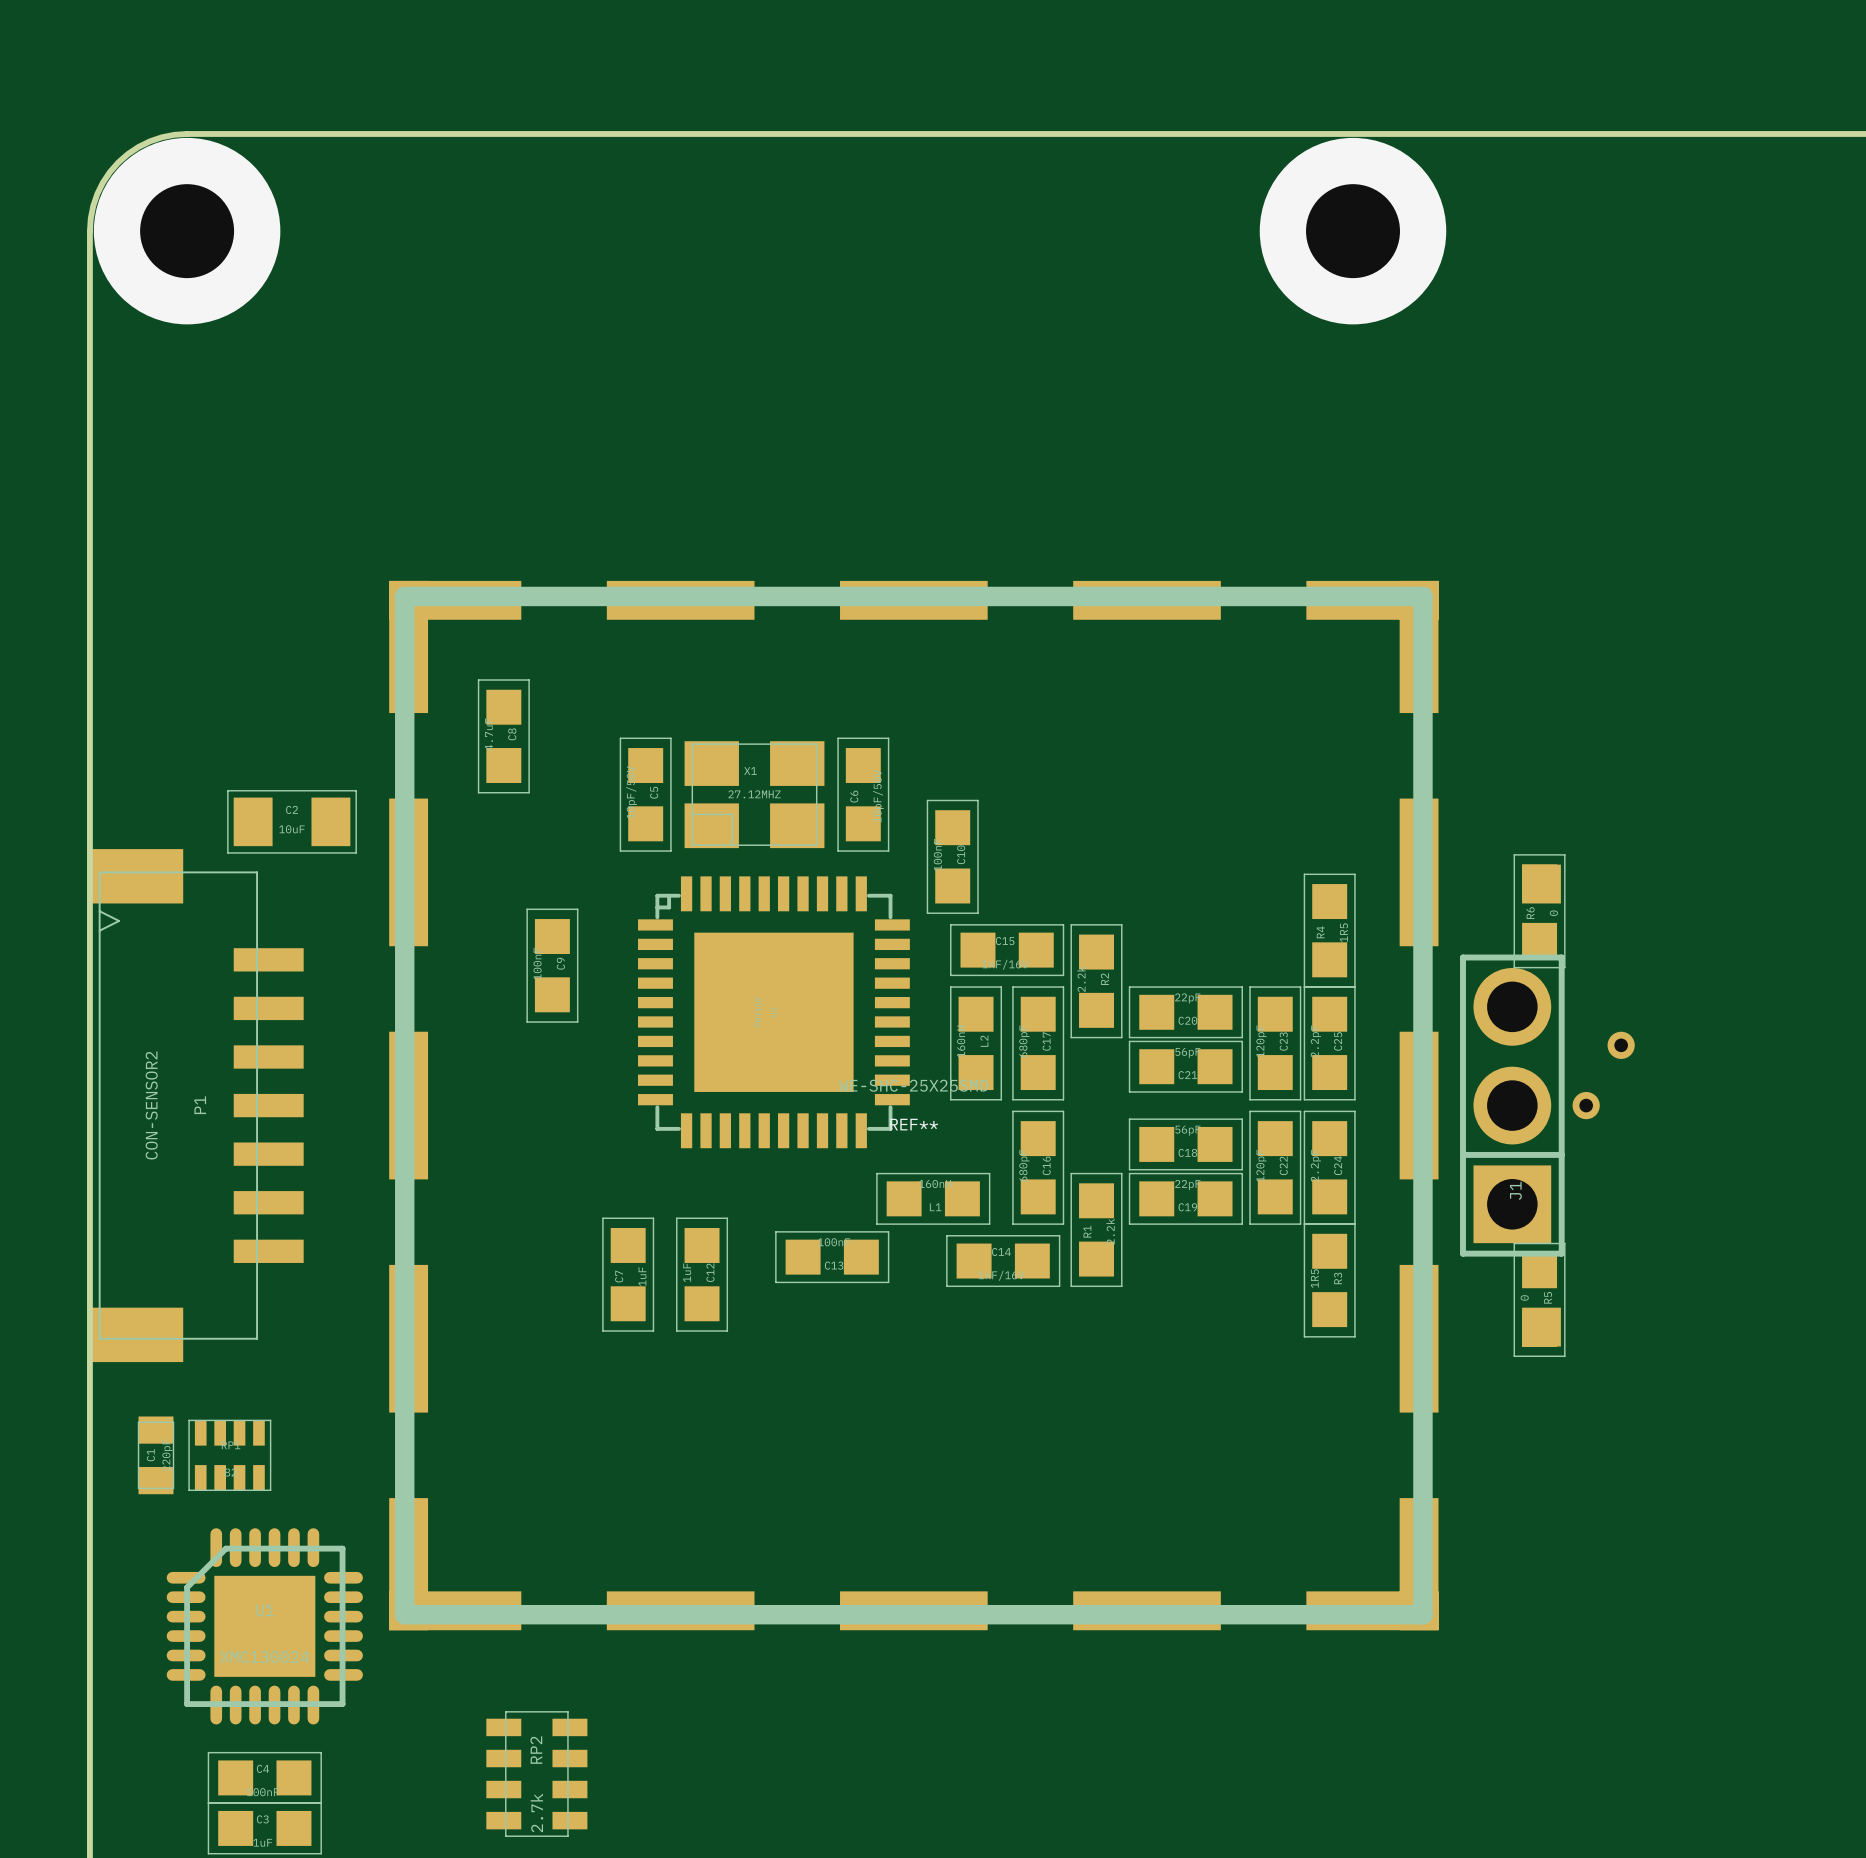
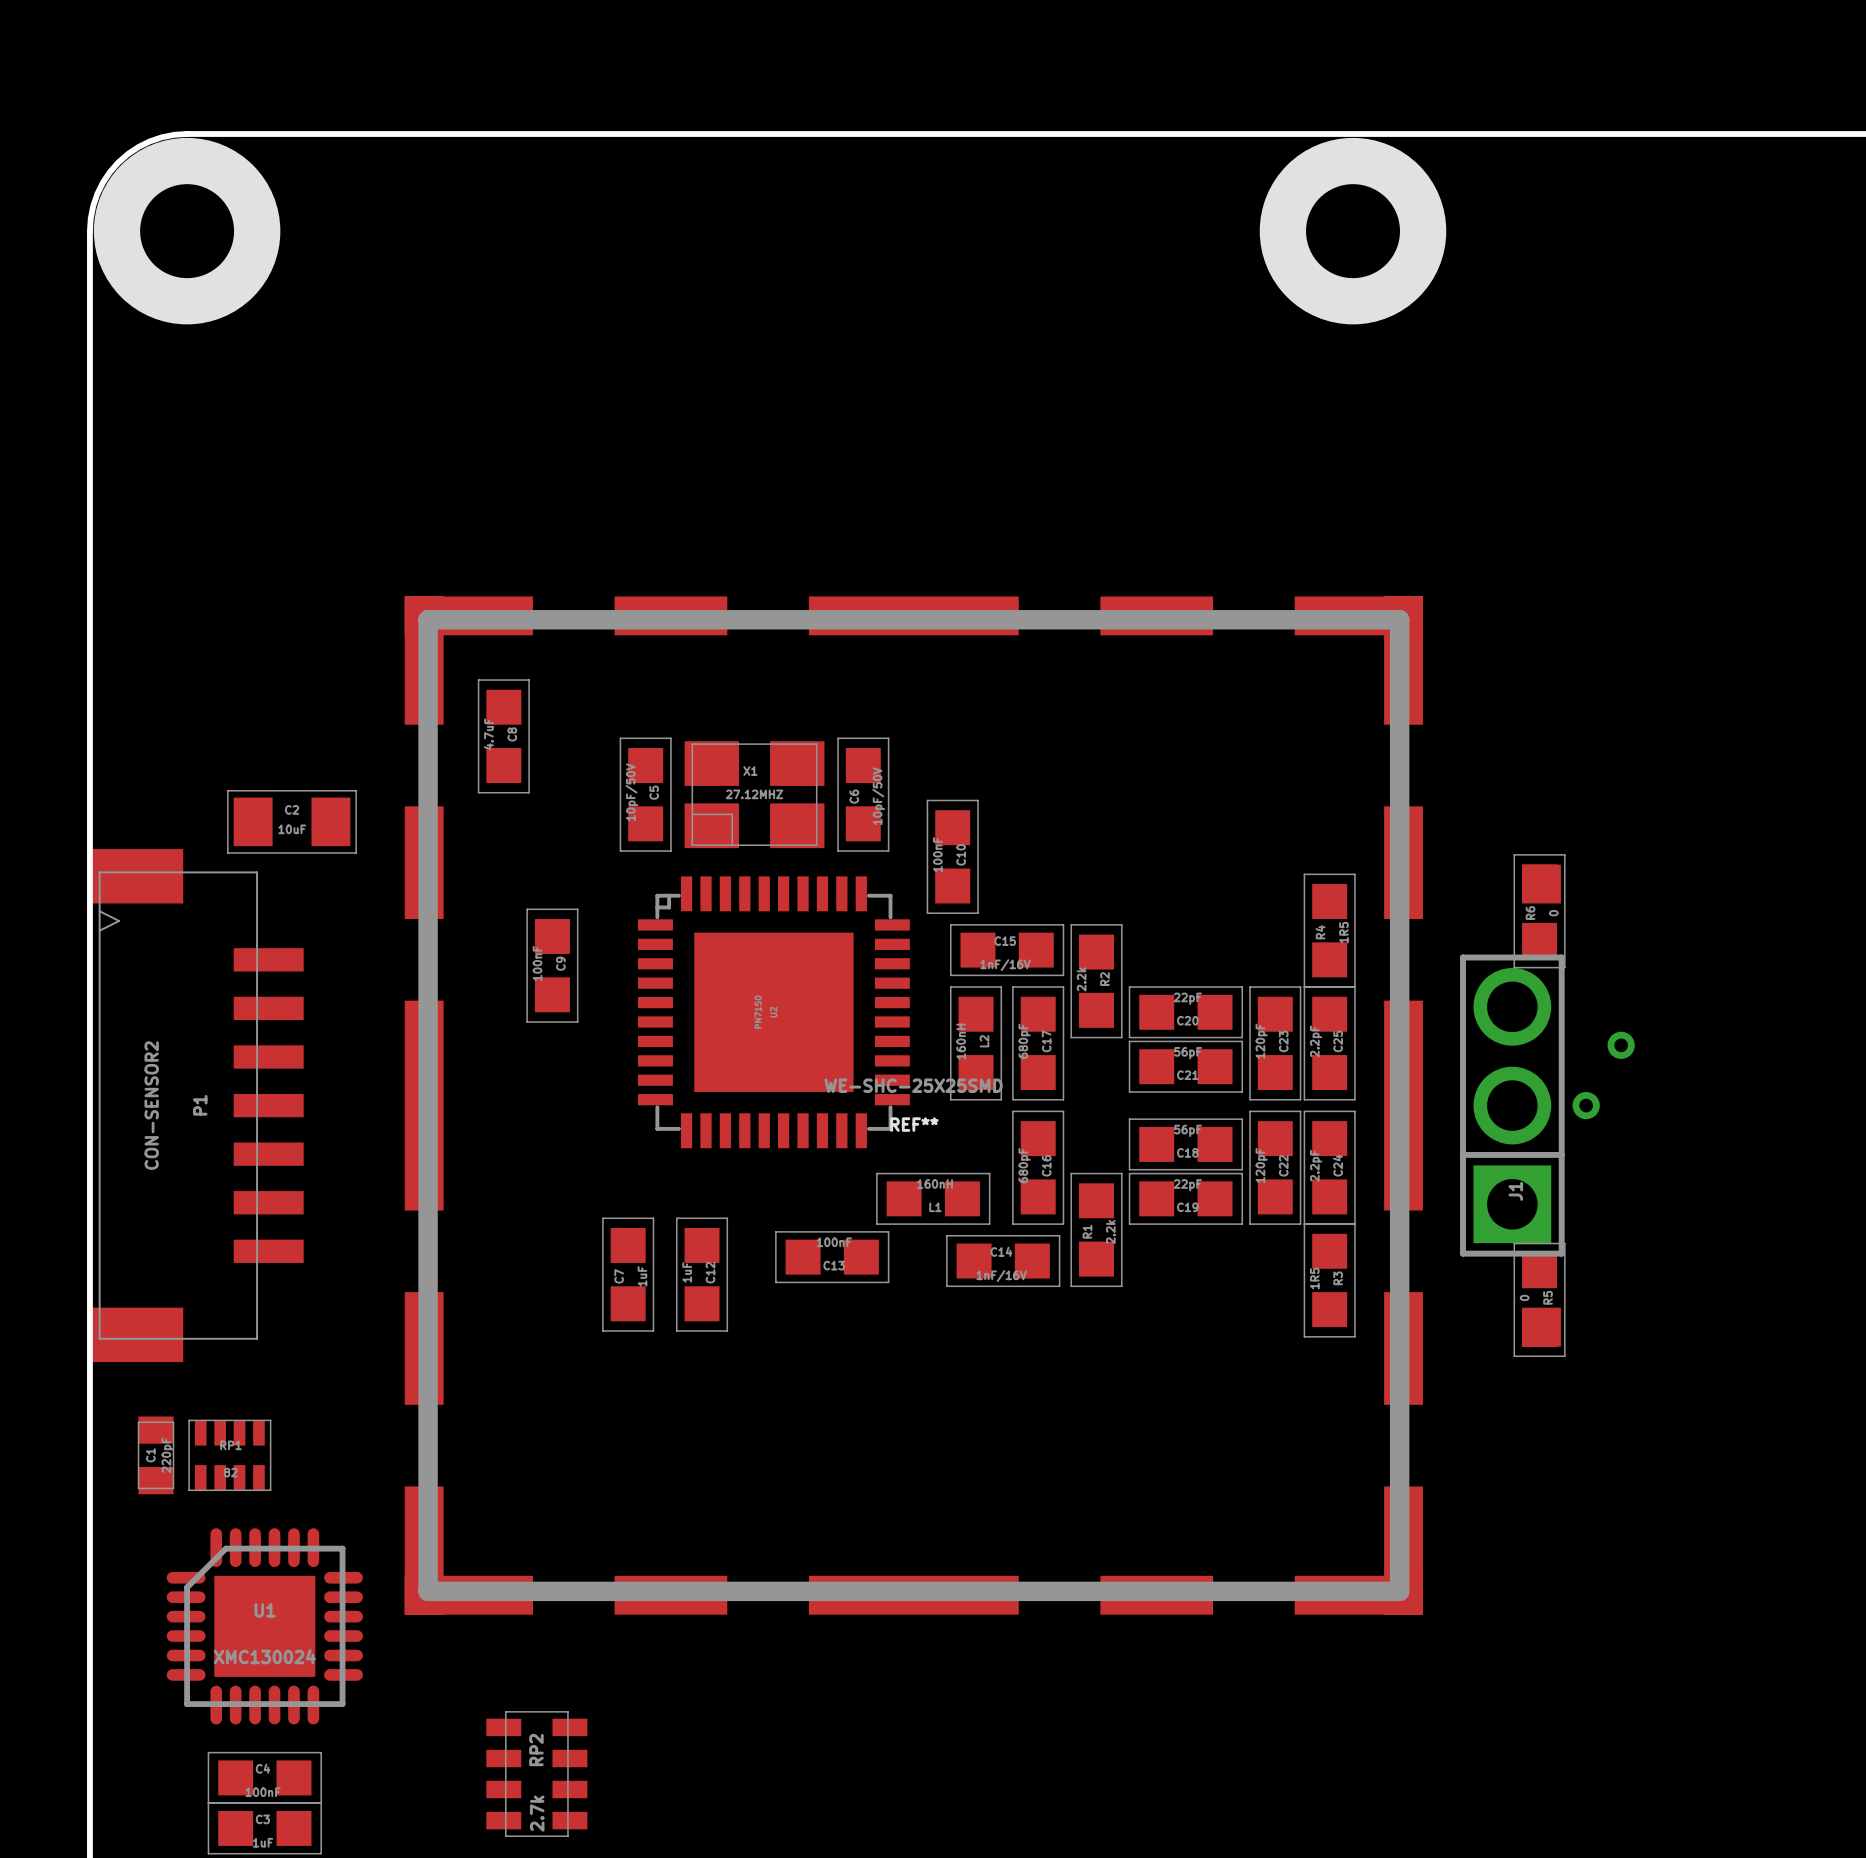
REF** footprint: [389, 580, 1439, 1631] -> [404, 596, 1423, 1615]

